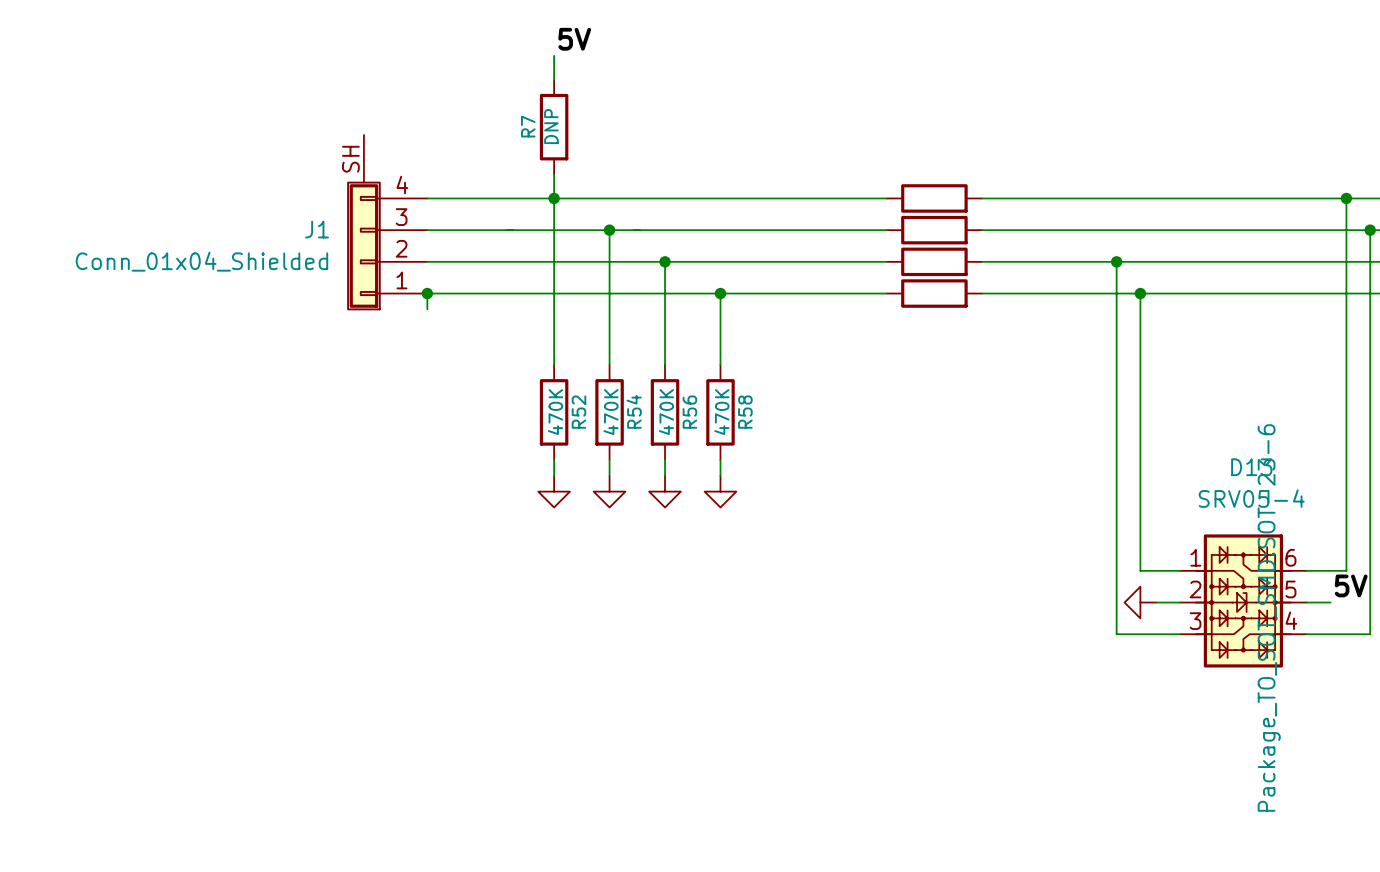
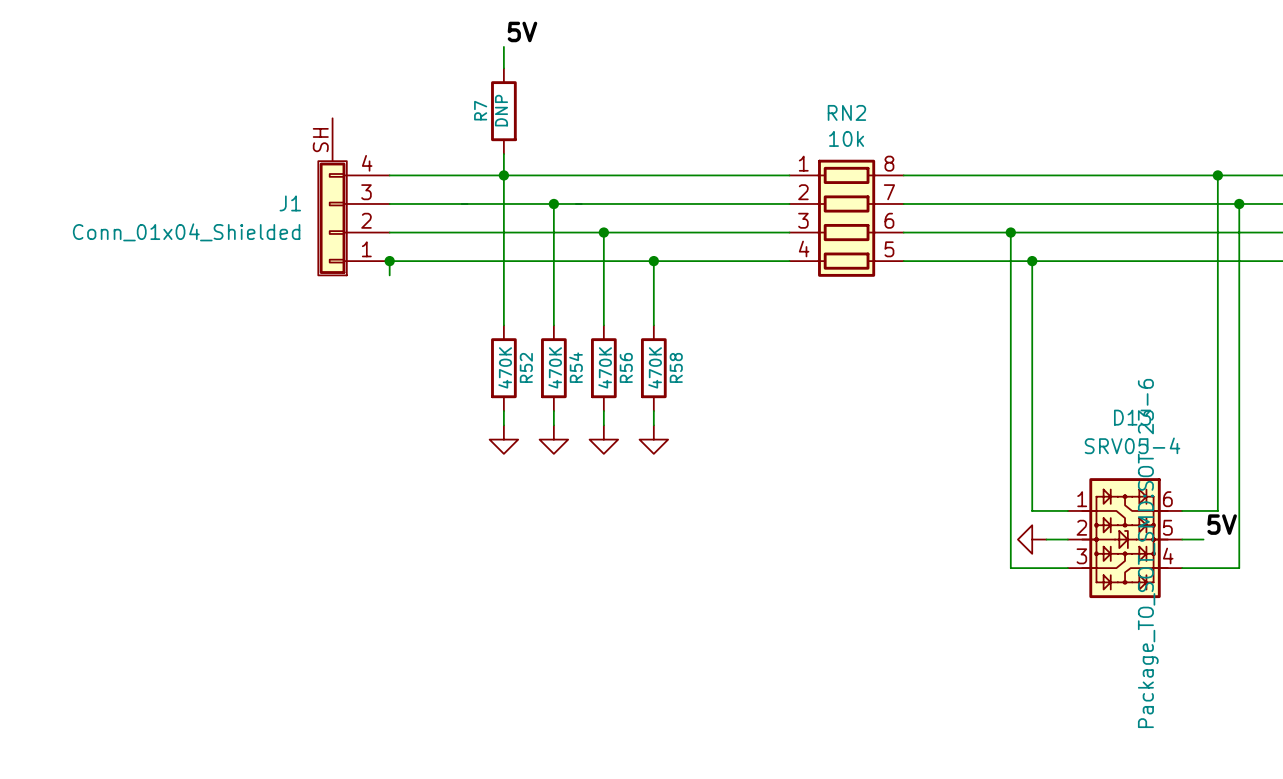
part: (934, 198) -> none
part: (934, 230) -> none
RN2: none -> 10k (846, 218)
part: (934, 261) -> none
part: (934, 293) -> none

